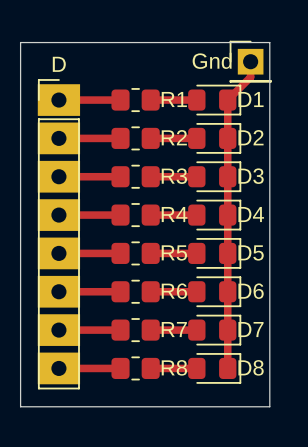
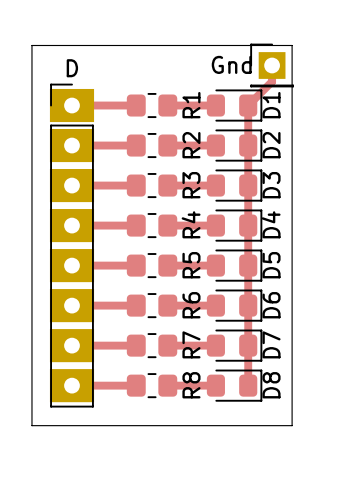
R1 name rotation: 0° (174, 99) -> 90° counterclockwise (191, 105)
D1 name rotation: 0° (250, 99) -> 90° counterclockwise (271, 105)
R2 name rotation: 0° (174, 137) -> 90° counterclockwise (191, 145)
D2 name rotation: 0° (250, 137) -> 90° counterclockwise (271, 145)
R3 name rotation: 0° (174, 176) -> 90° counterclockwise (191, 185)
D3 name rotation: 0° (251, 176) -> 90° counterclockwise (271, 185)
R4 name rotation: 0° (174, 214) -> 90° counterclockwise (191, 224)
D4 name rotation: 0° (251, 214) -> 90° counterclockwise (271, 224)
R5 name rotation: 0° (174, 252) -> 90° counterclockwise (191, 265)
D5 name rotation: 0° (251, 252) -> 90° counterclockwise (271, 265)
R6 name rotation: 0° (174, 291) -> 90° counterclockwise (191, 305)
D6 name rotation: 0° (251, 291) -> 90° counterclockwise (271, 305)
R7 name rotation: 0° (174, 329) -> 90° counterclockwise (191, 344)
D7 name rotation: 0° (250, 329) -> 90° counterclockwise (271, 344)
R8 name rotation: 0° (174, 367) -> 90° counterclockwise (191, 385)
D8 name rotation: 0° (251, 367) -> 90° counterclockwise (271, 385)

